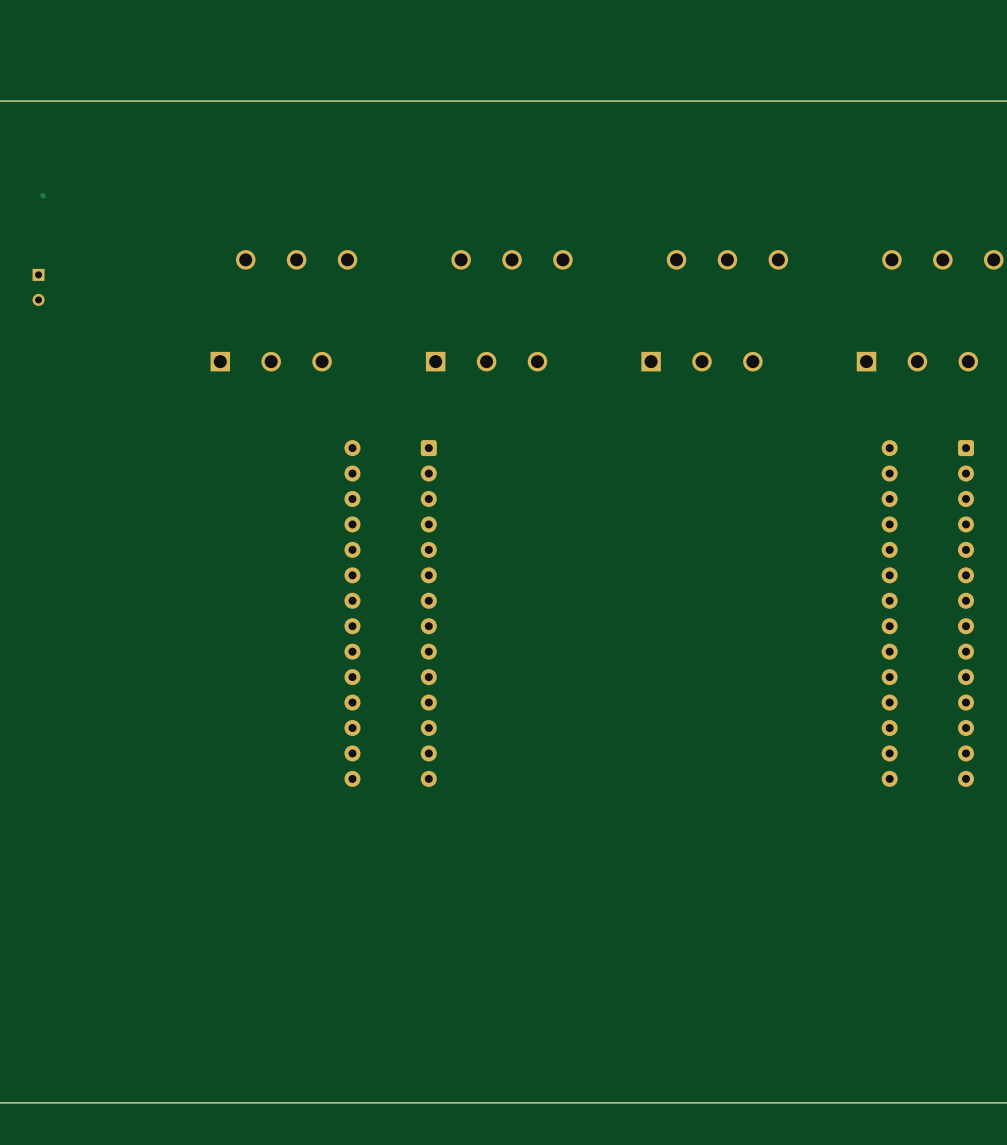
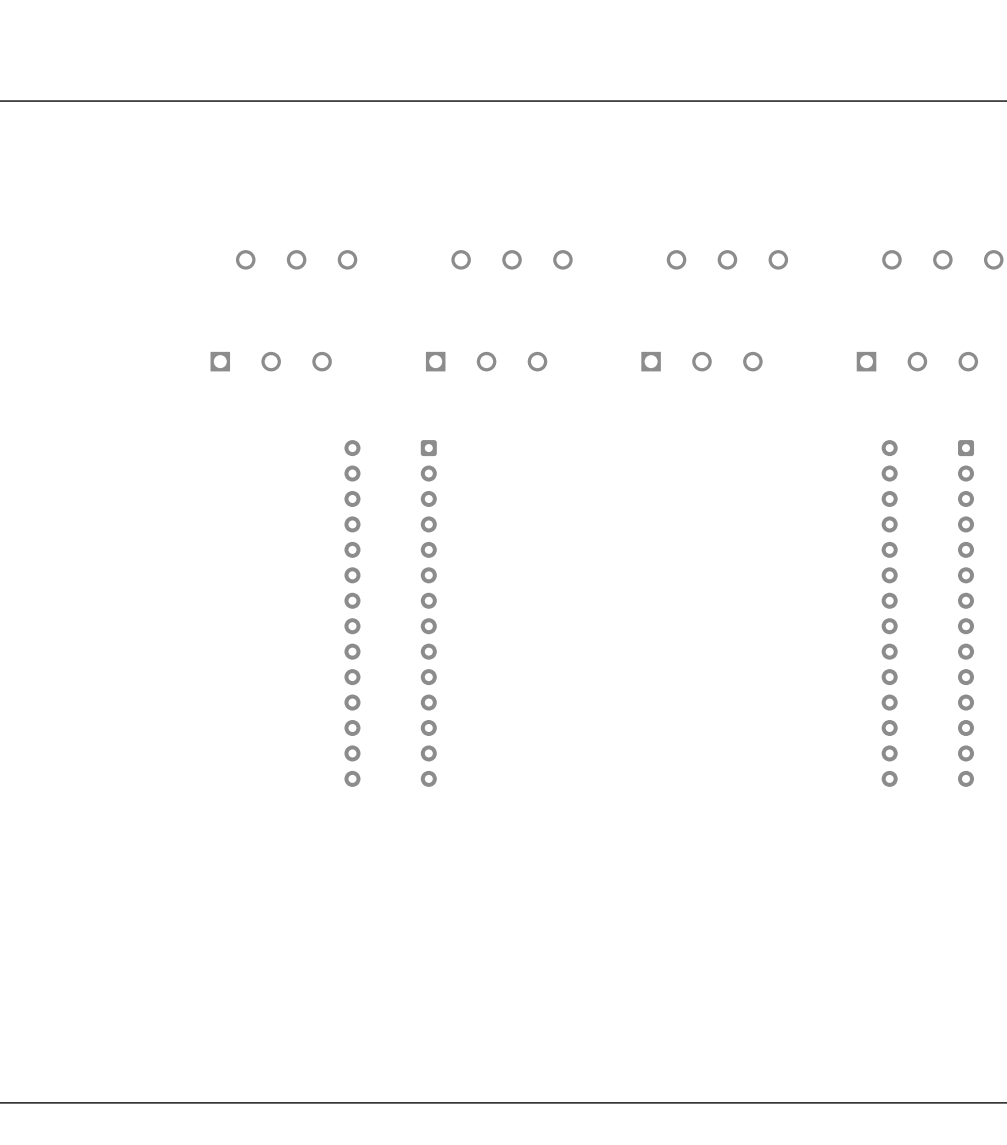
track: (42, 195) (43, 196) -> none
part: (38, 287) -> none

